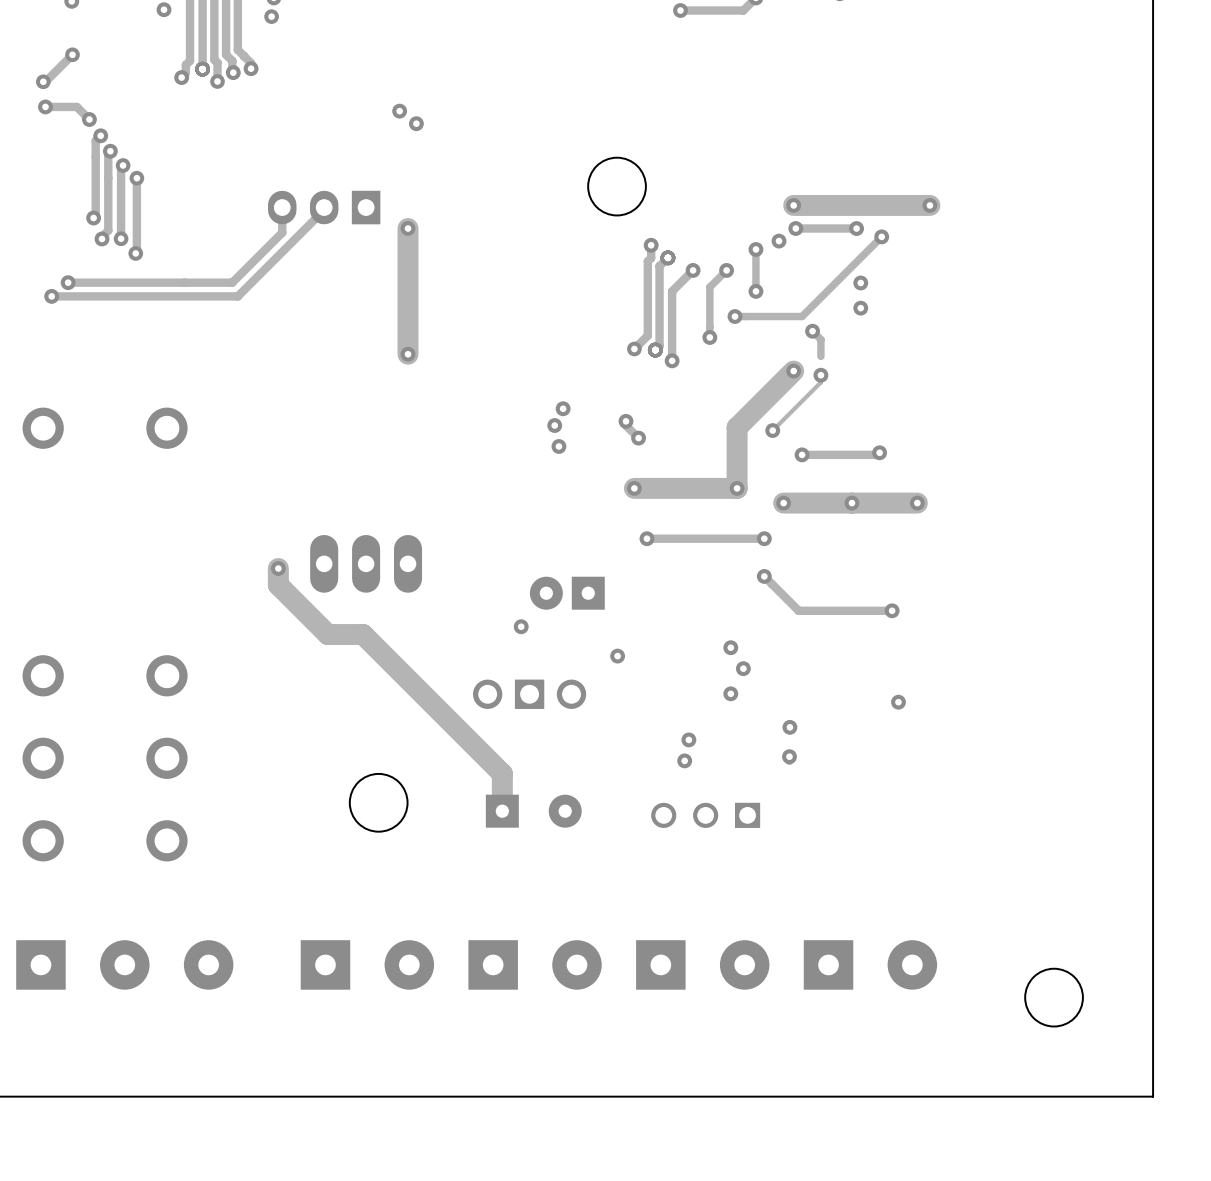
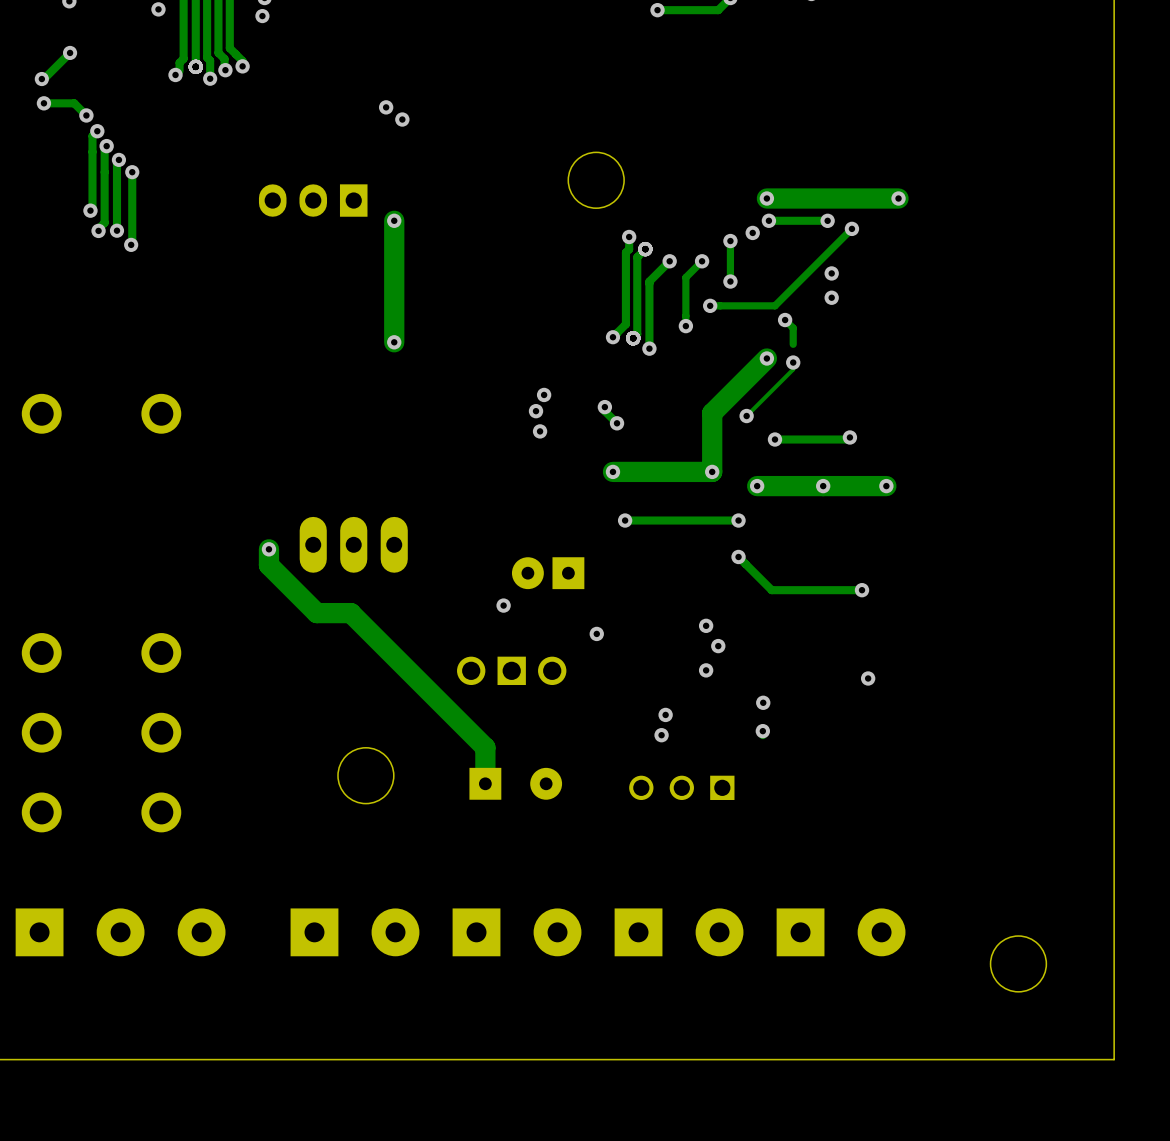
track: (282, 207) (282, 232) (232, 282) (68, 282) -> none
track: (324, 207) (324, 210) (237, 296) (51, 296) -> none
via: (68, 282) -> none
via: (51, 296) -> none

